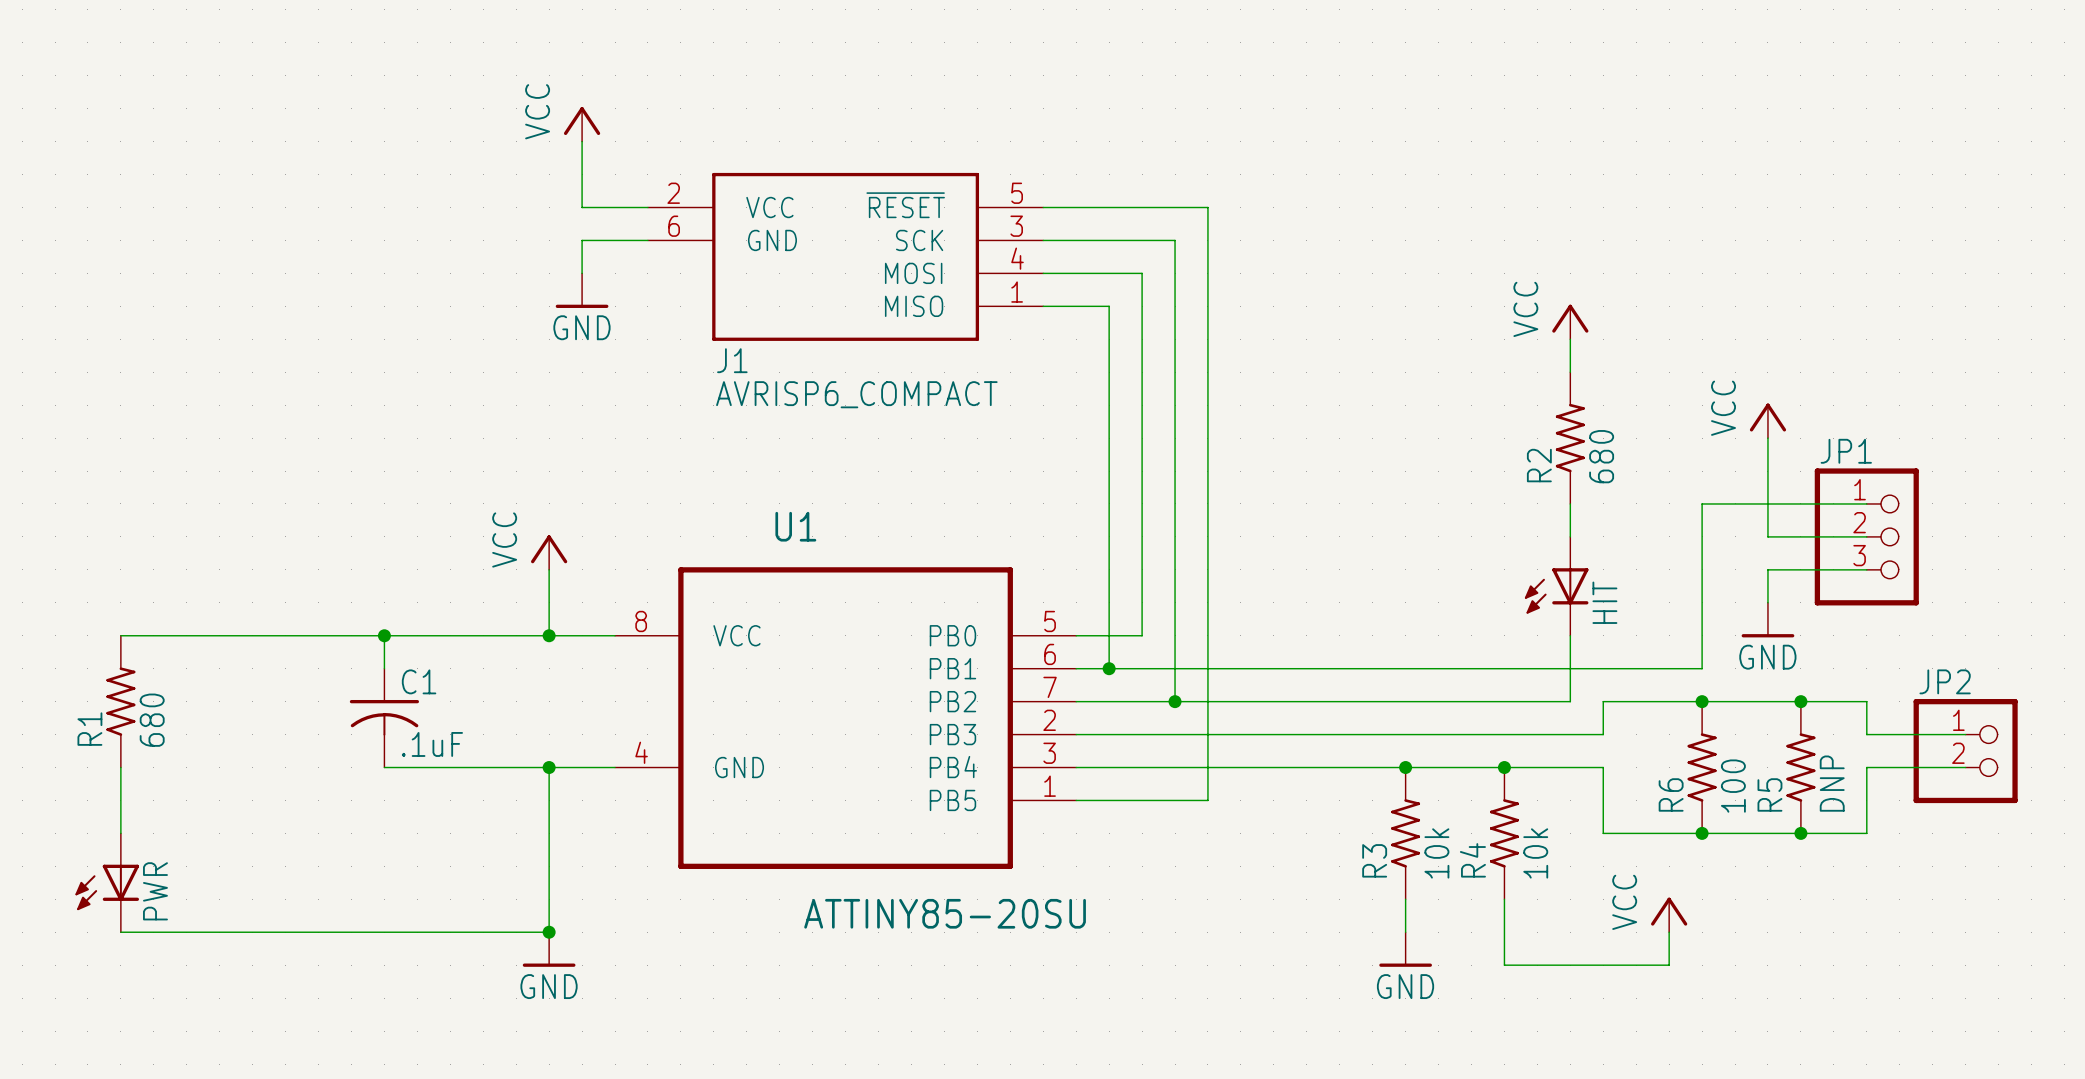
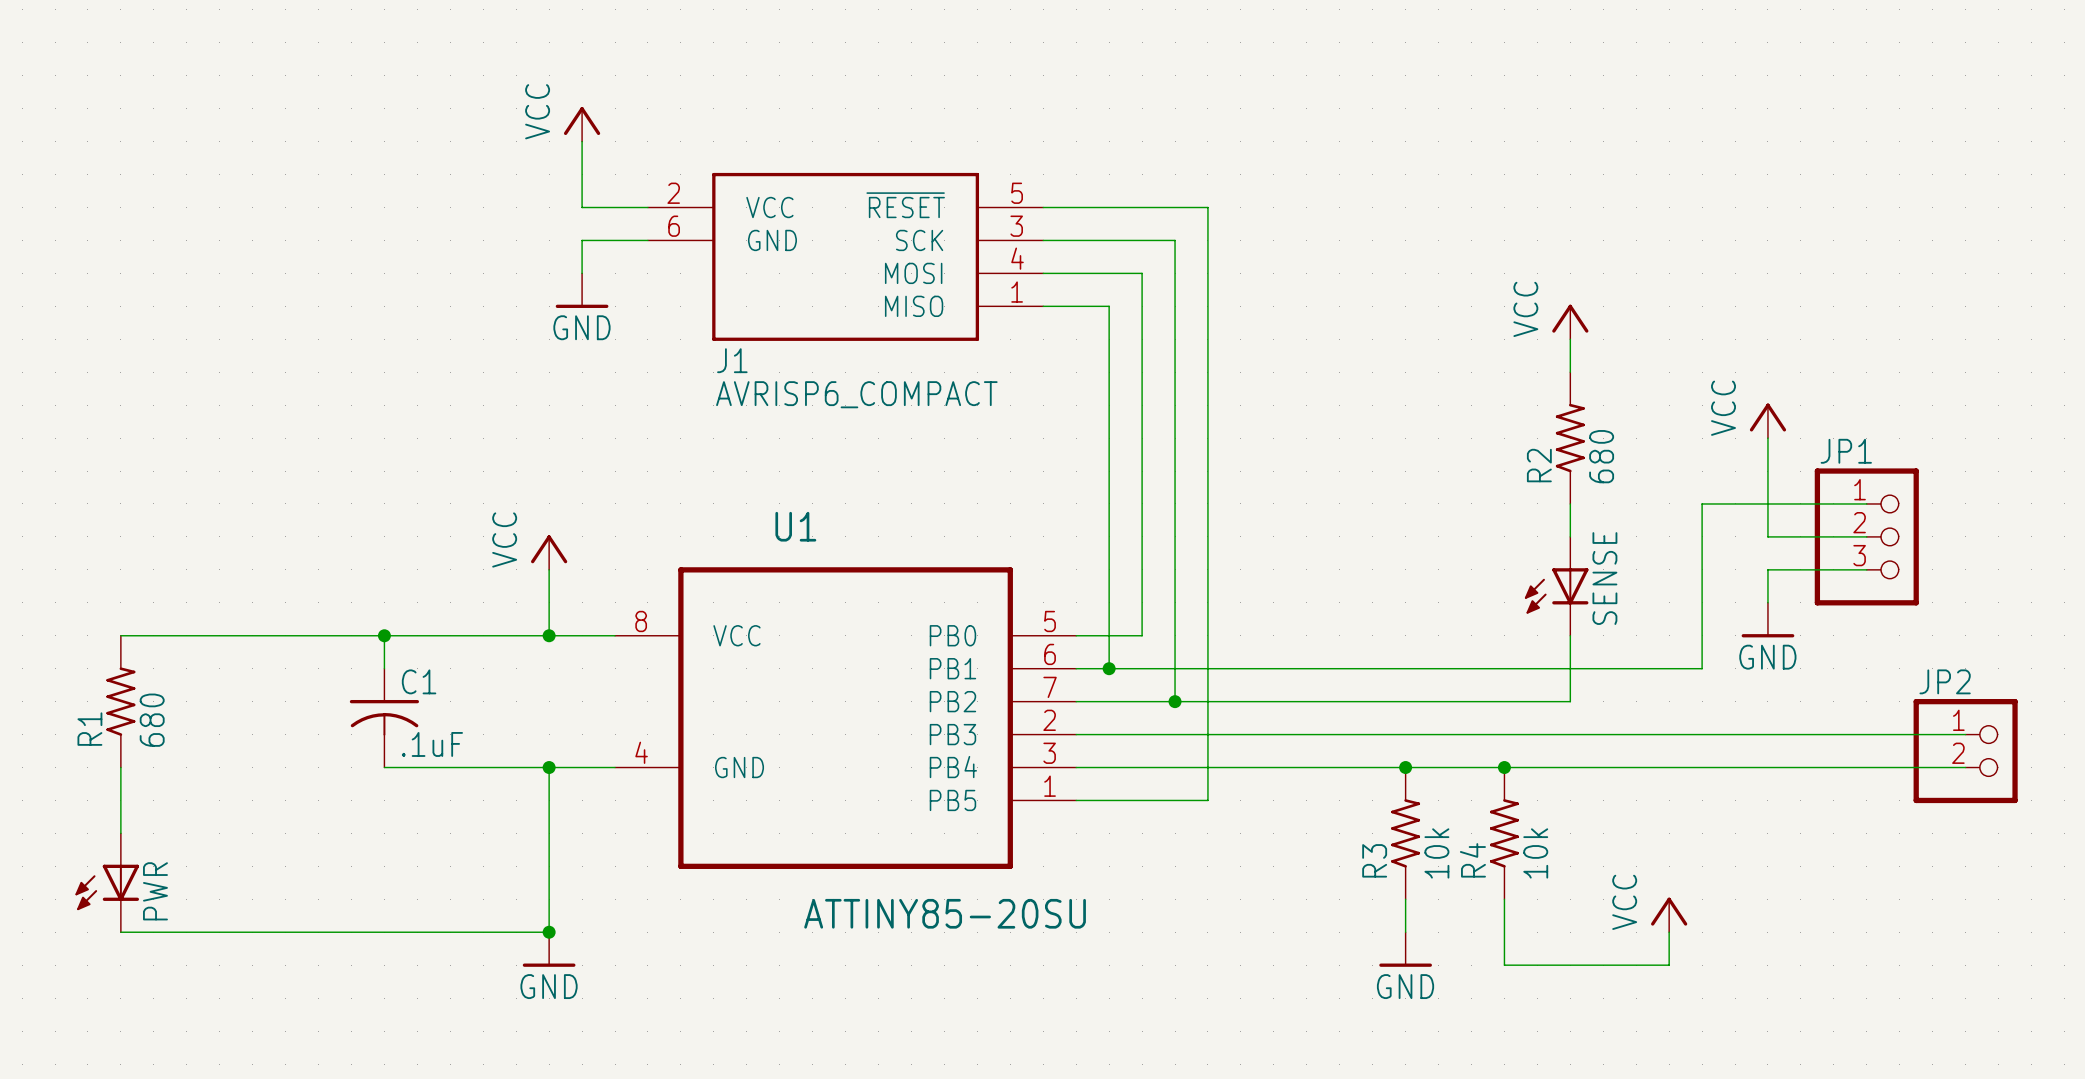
HIT name: HIT (1604, 602) -> SENSE (1604, 578)
junction: (1702, 701) -> none
junction: (1800, 701) -> none
wire: (1603, 734) (1603, 701) (1866, 701) (1866, 734) -> (1603, 734) (1866, 734)
wire: (1603, 767) (1603, 833) (1866, 833) (1866, 767) -> (1603, 767) (1866, 767)
R6: 100 (1702, 767) -> none
R5: DNP (1800, 767) -> none
junction: (1702, 833) -> none
junction: (1800, 833) -> none

